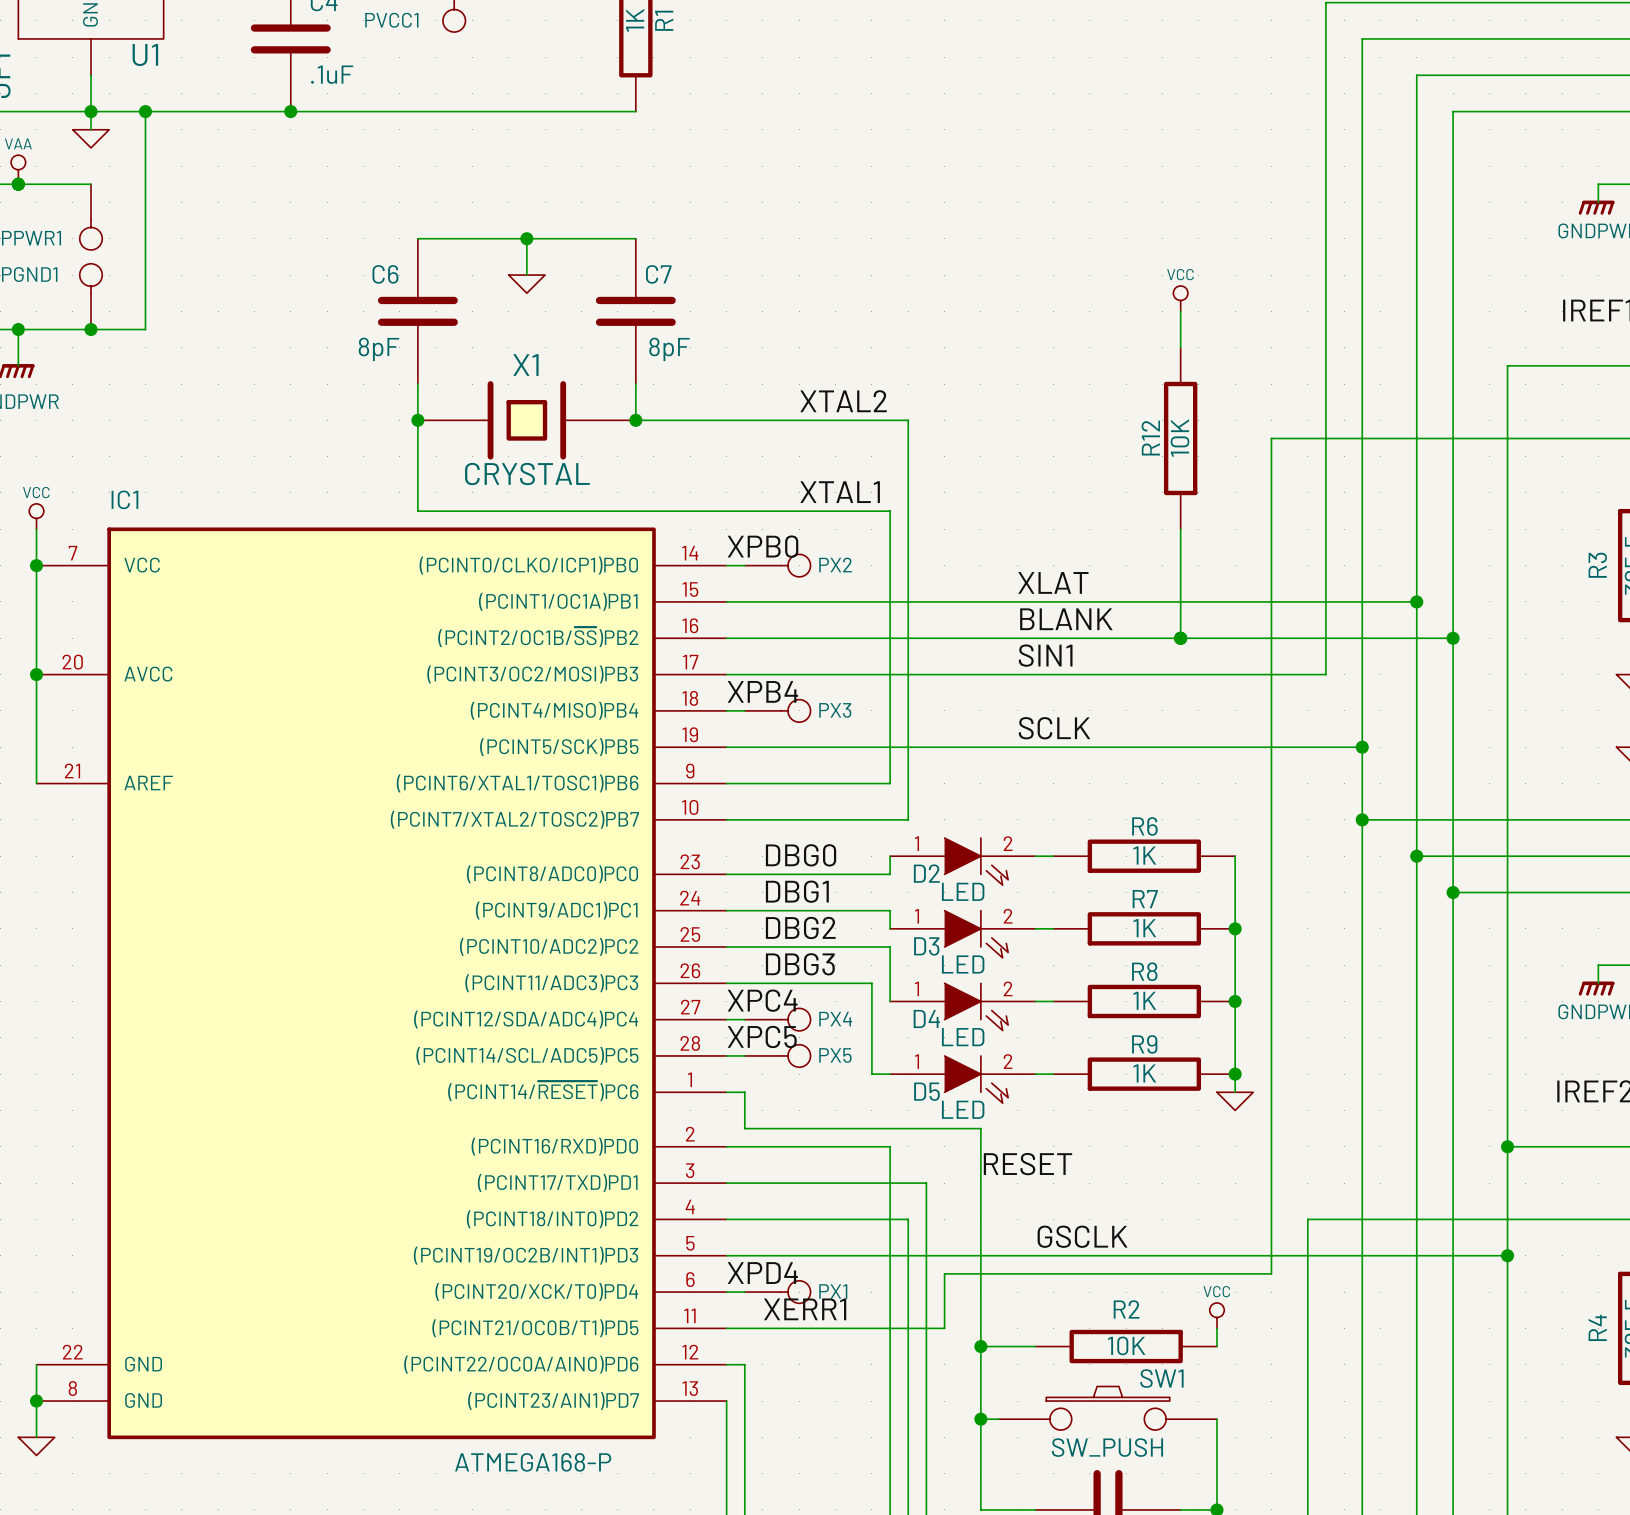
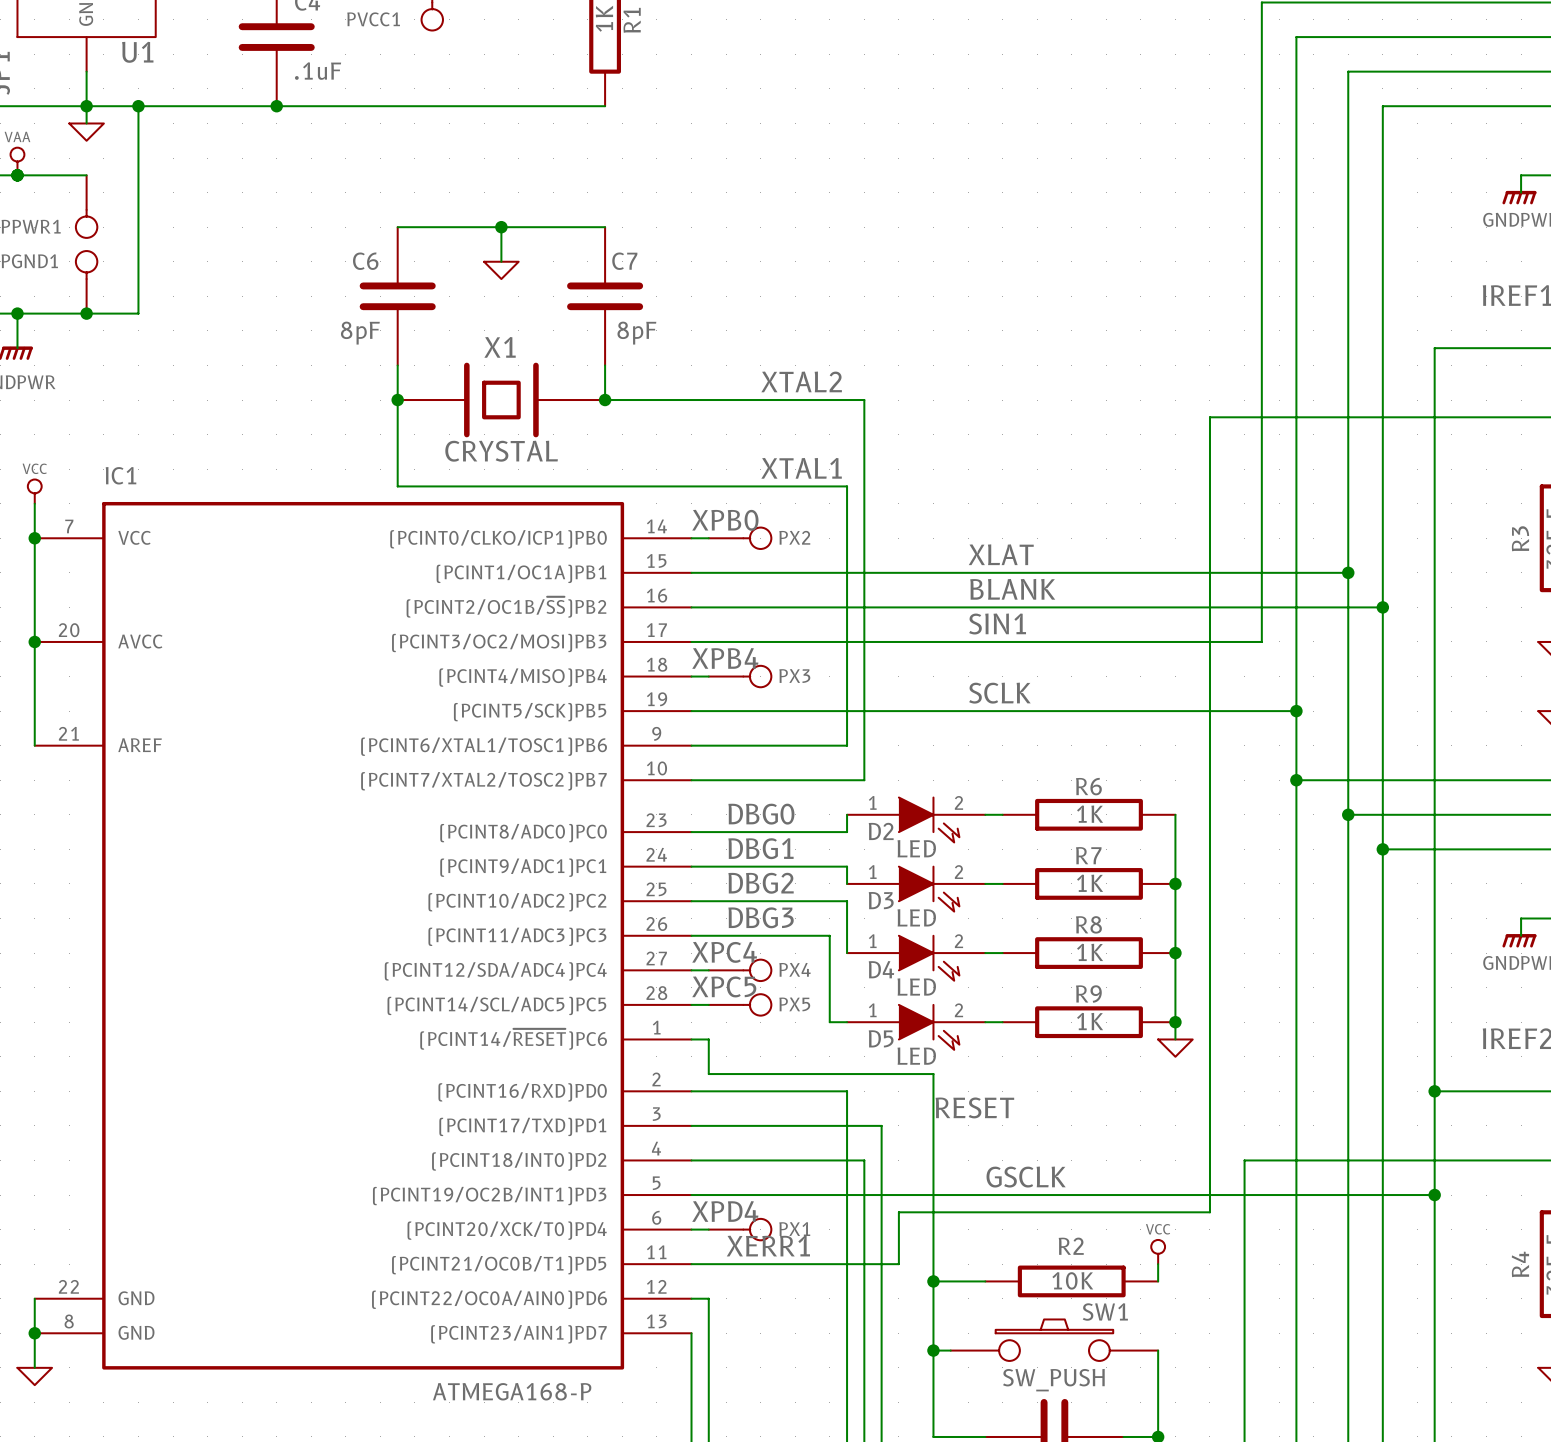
power symbol: VCC (1180, 298) -> none
wire: (1180, 311) (1180, 347) -> none
R12: 10K (1180, 438) -> none
wire: (1180, 529) (1180, 638) -> none
junction: (1180, 638) -> none

